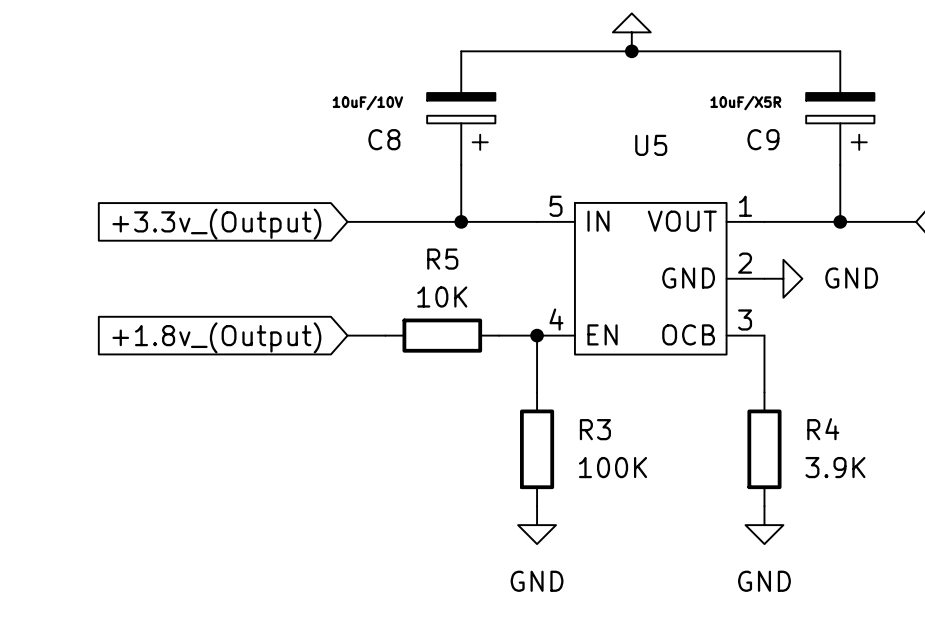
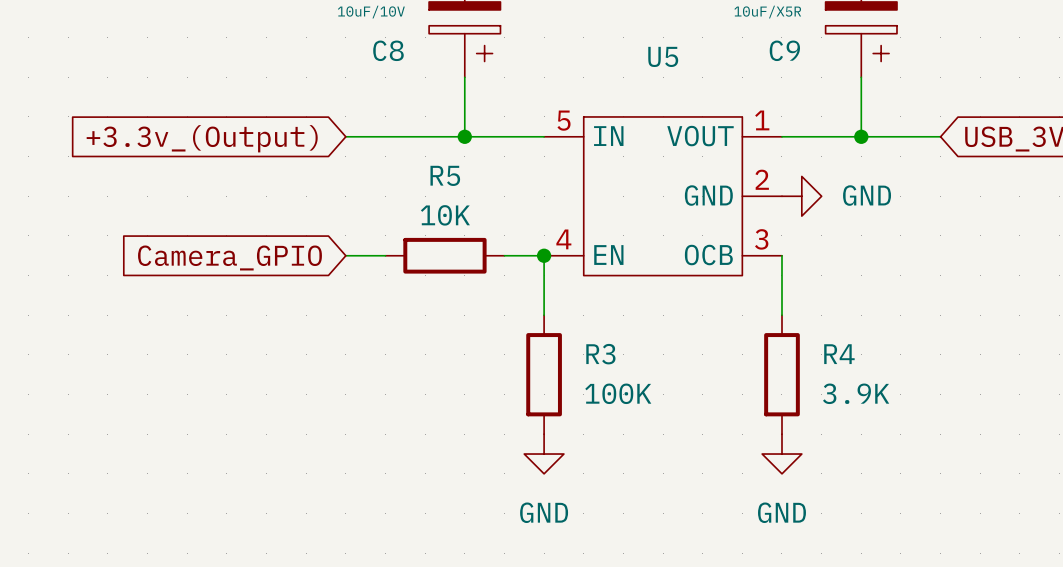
global label: +1.8v_(Output) (216, 337) -> Camera_GPIO (229, 257)

